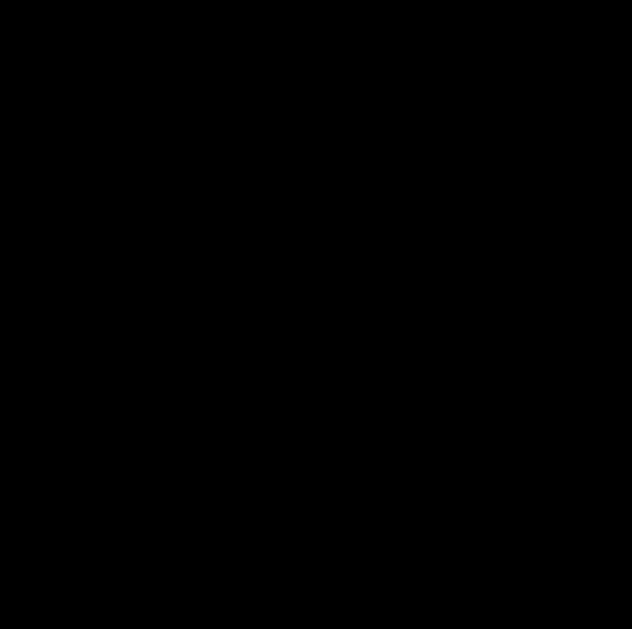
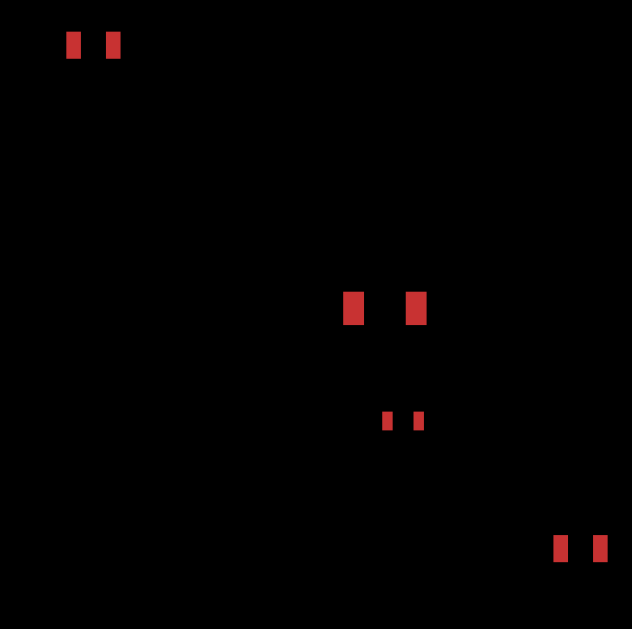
part: none -> (93, 45)
part: none -> (384, 308)
part: none -> (403, 421)
part: none -> (580, 548)

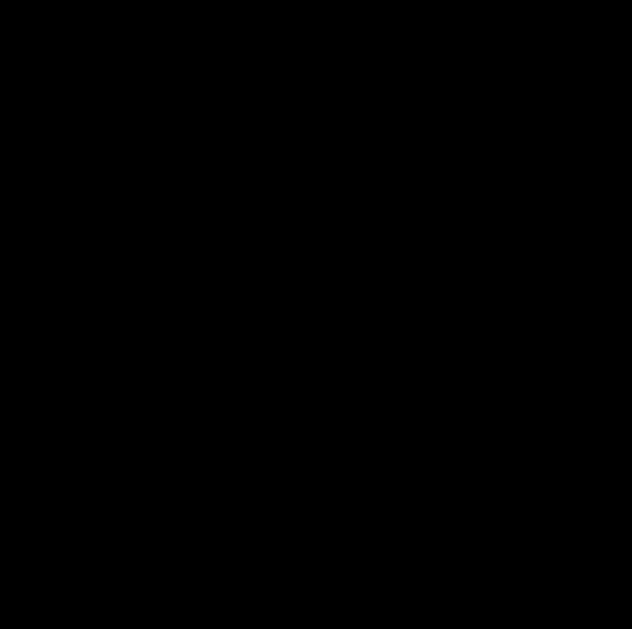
part: (93, 45) -> none
part: (384, 308) -> none
part: (403, 421) -> none
part: (580, 548) -> none

